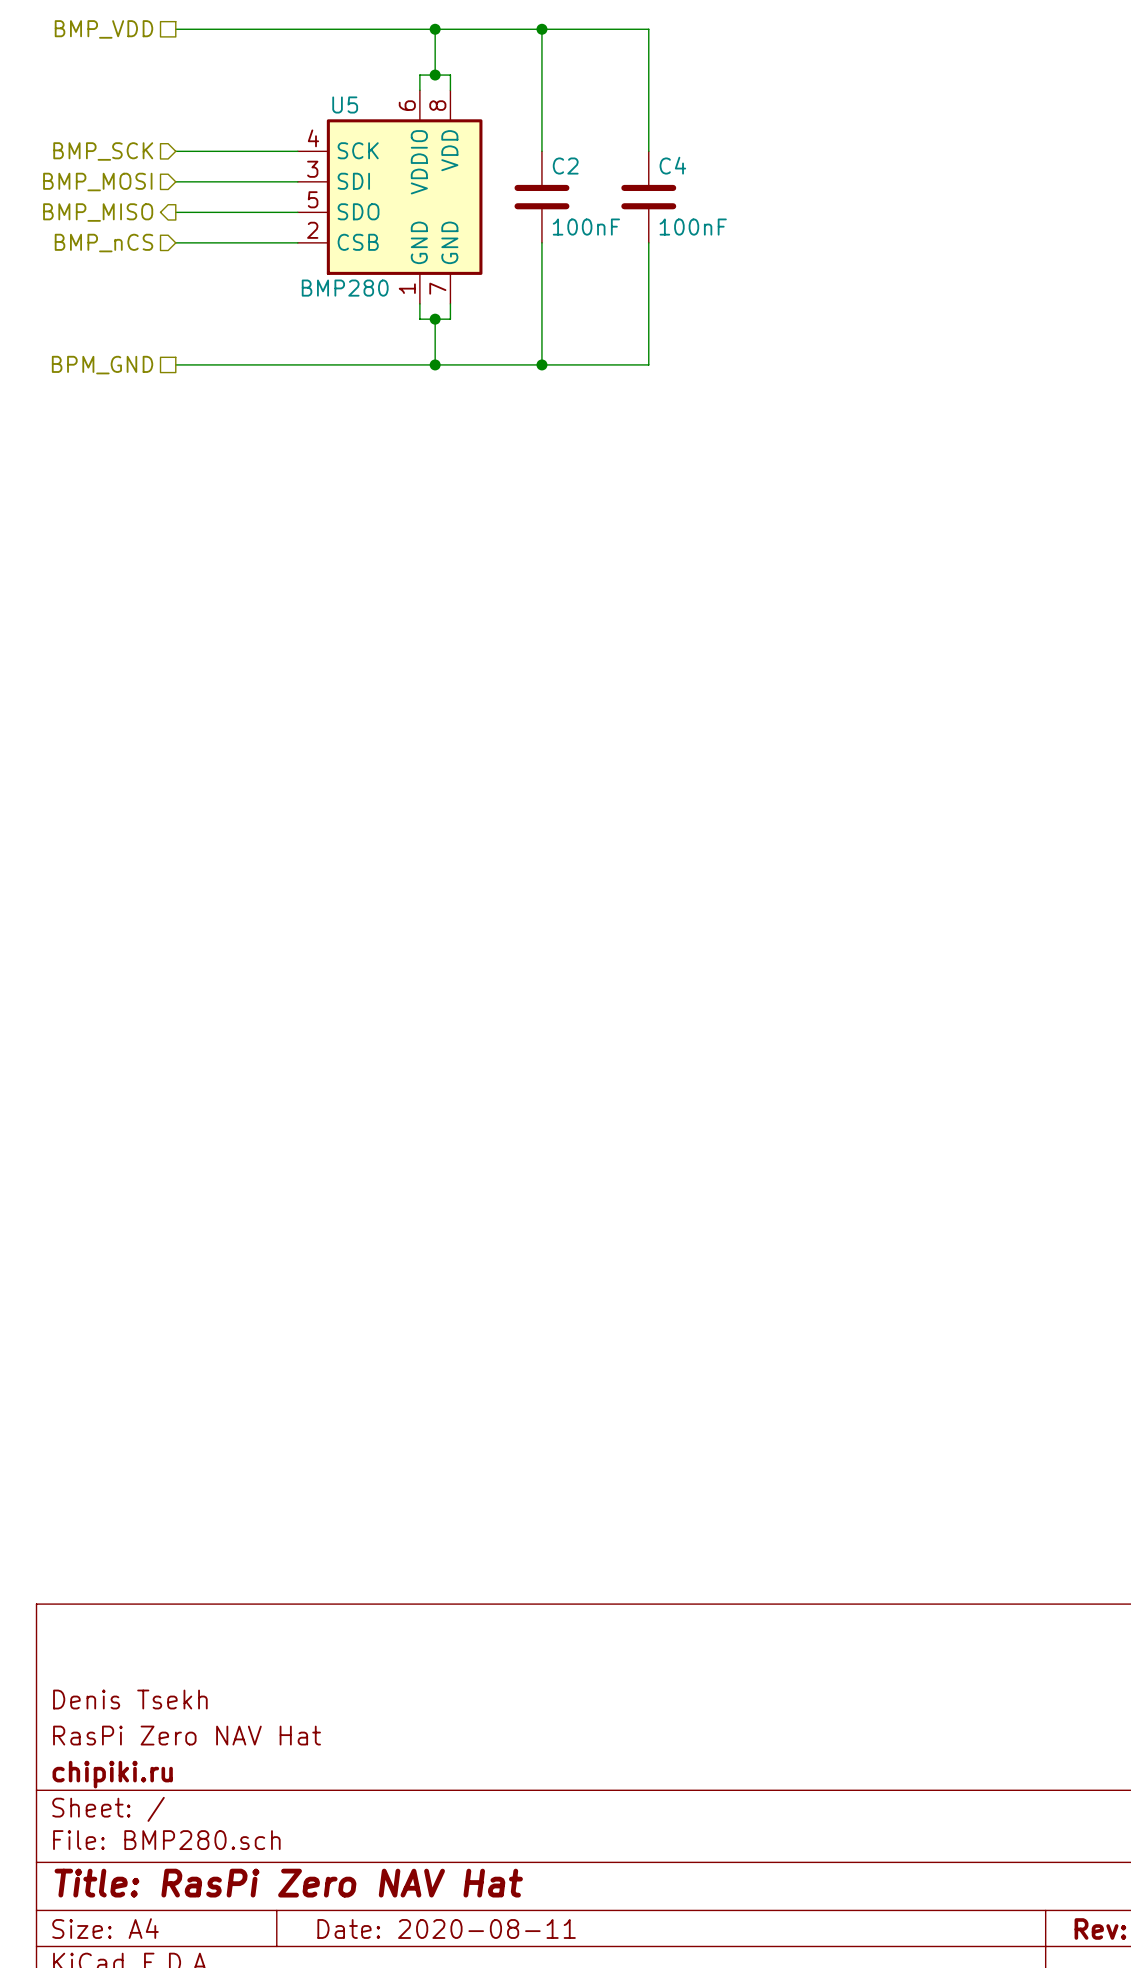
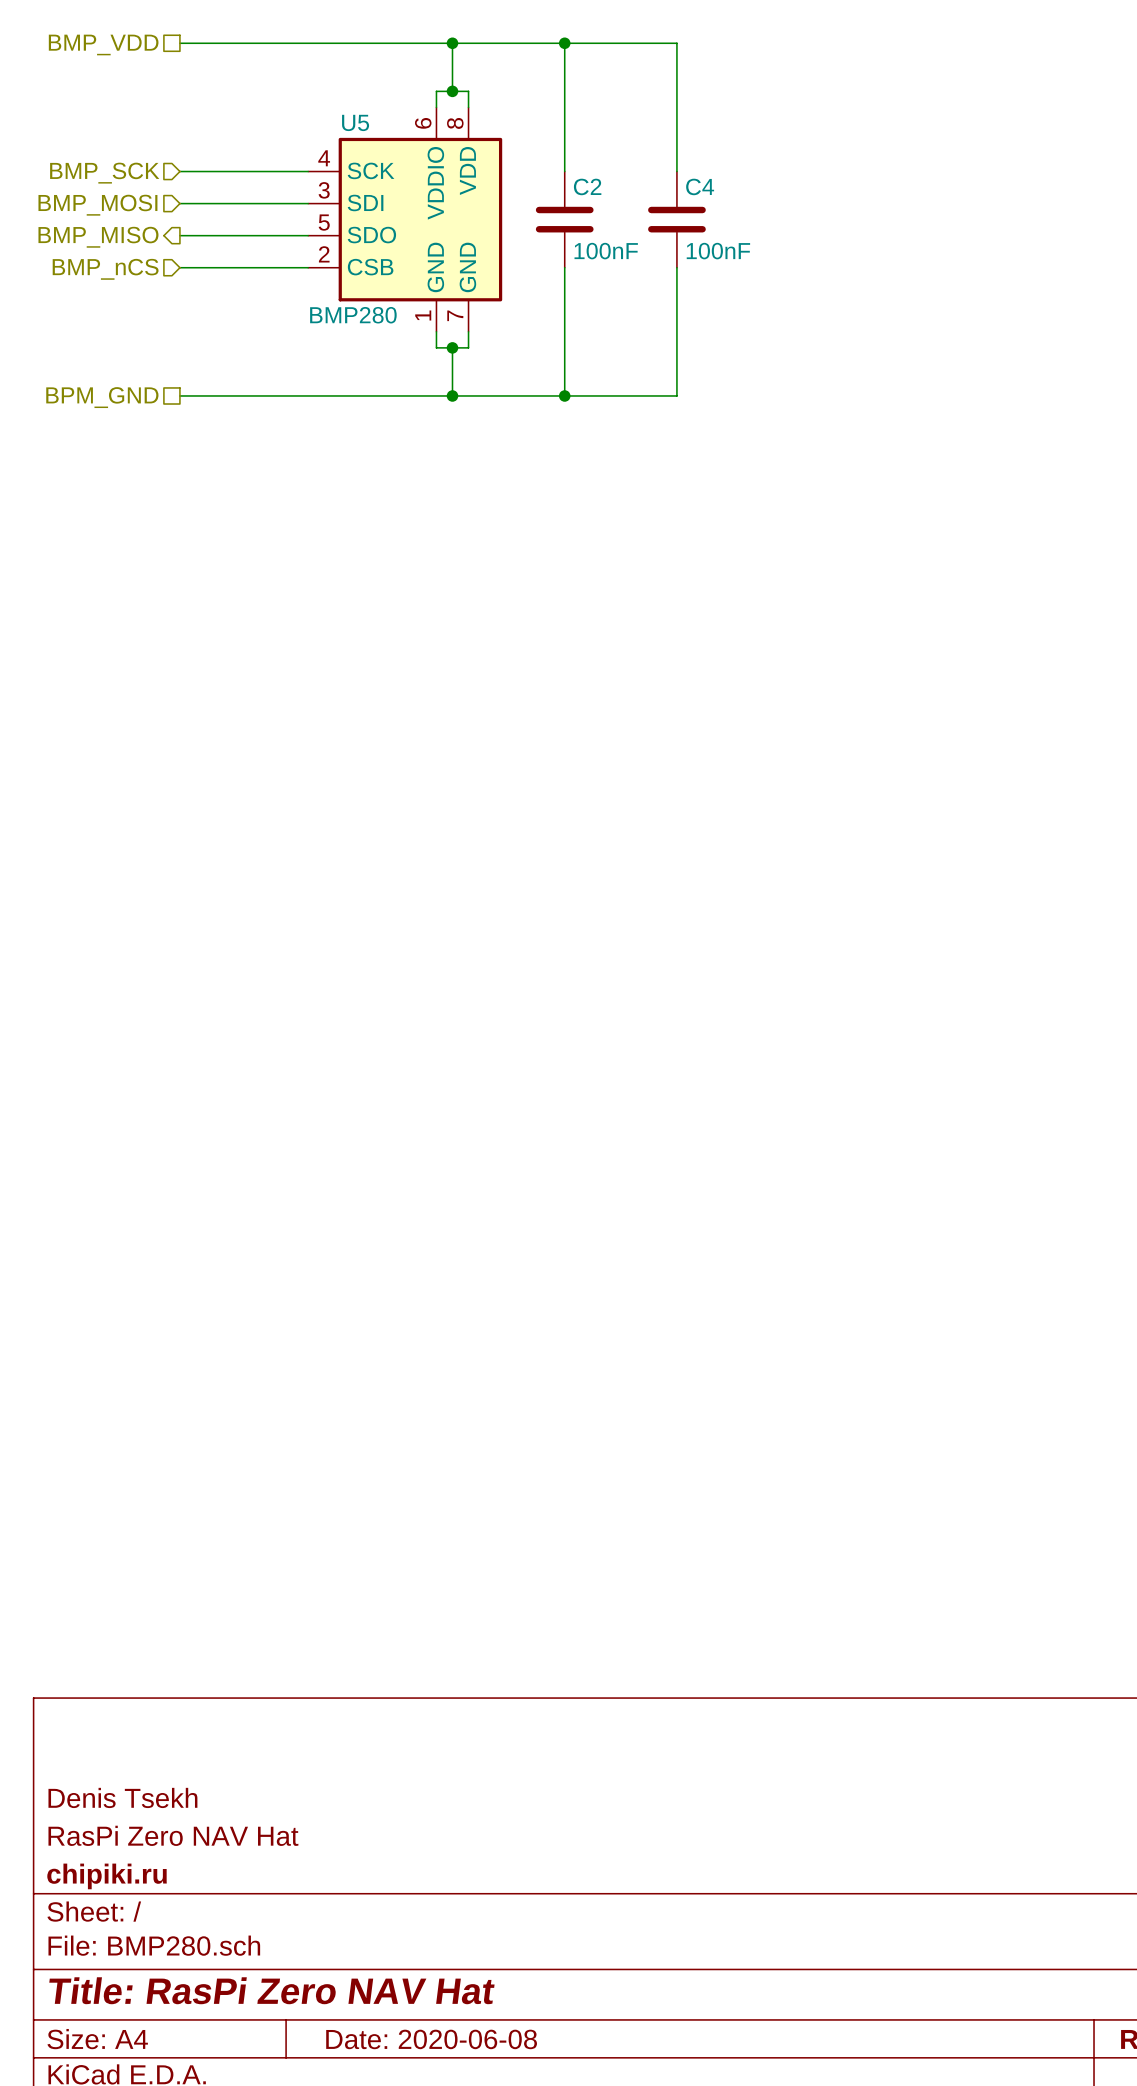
title block: Date: 2020-08-11 (446, 1928) -> Date: 2020-06-08 (431, 2039)

